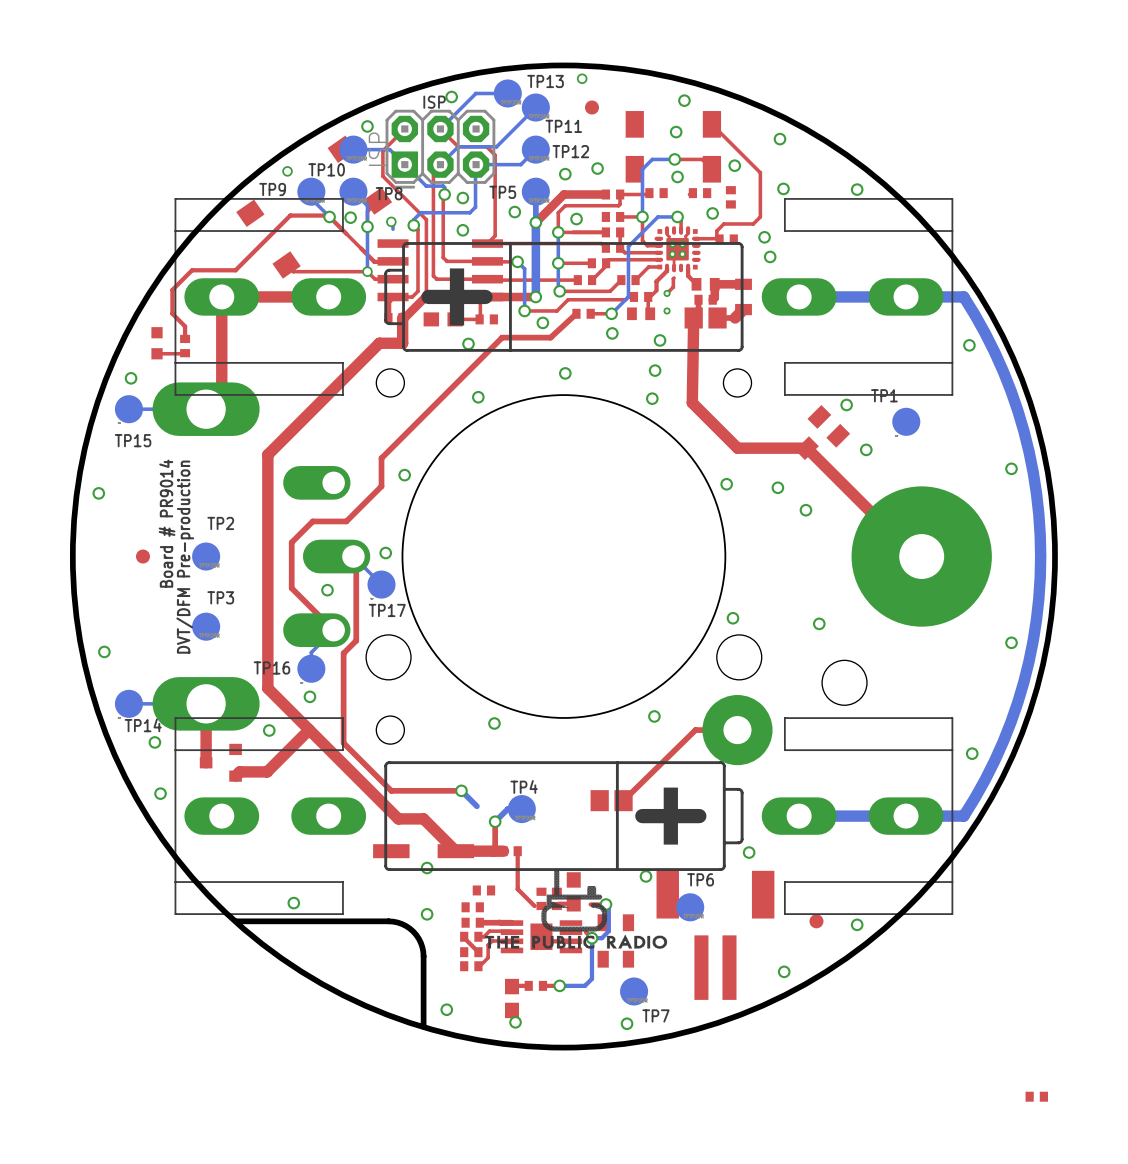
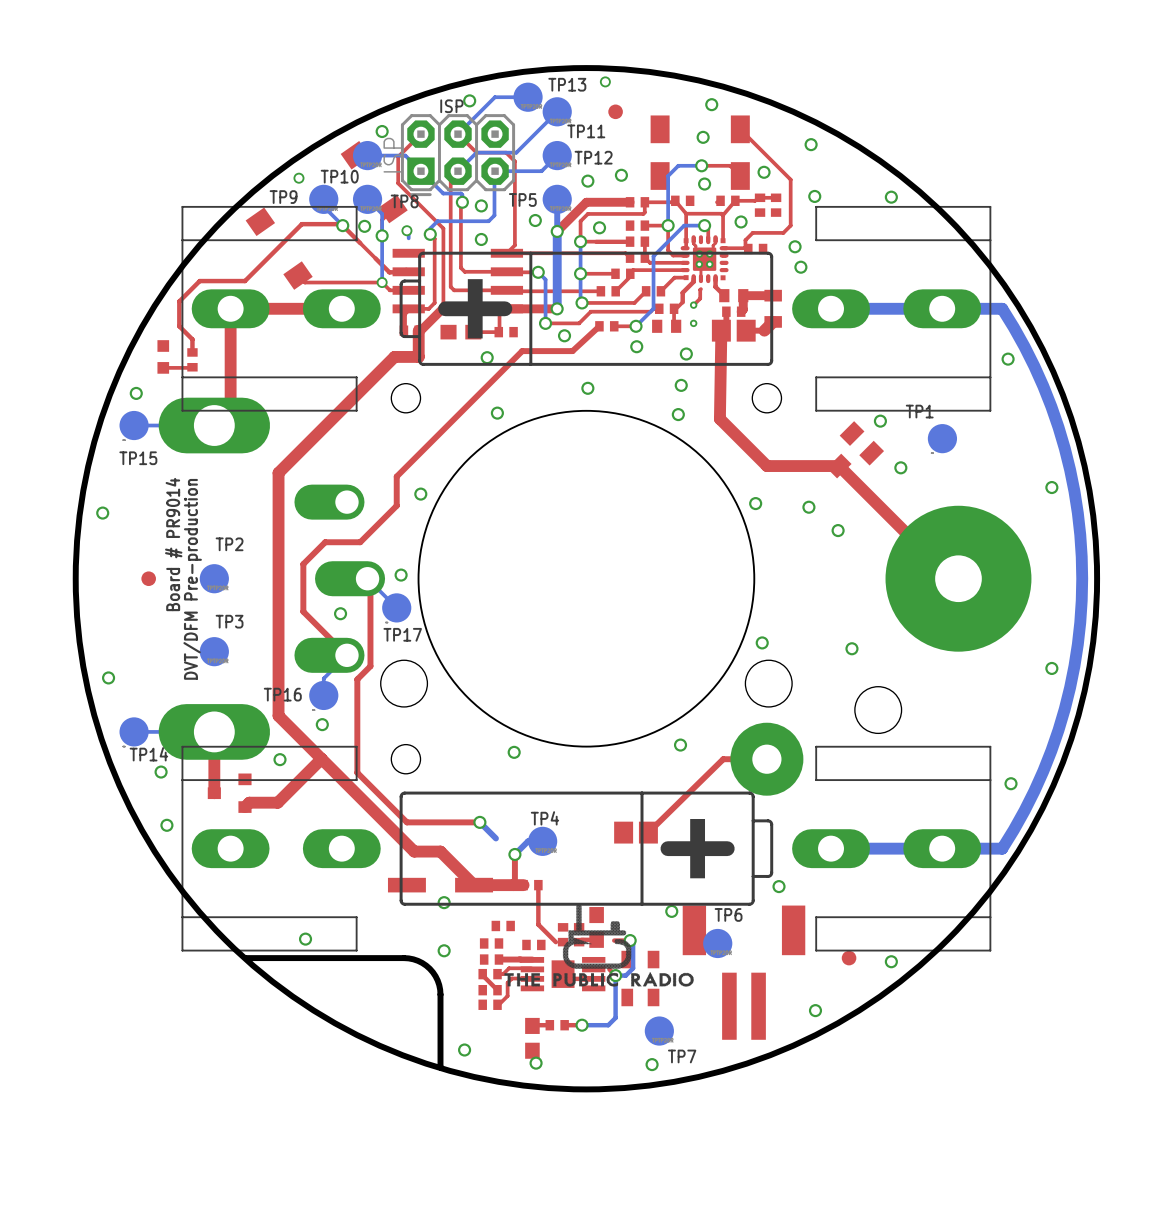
top track: none -> (776, 197) (735, 200) (723, 215)
top track: none -> (671, 202) (675, 200) (686, 213)
part: none -> (776, 205)
top track: none -> (686, 213) (685, 248)
top track: none -> (686, 213) (723, 215)
top track: none -> (723, 215) (723, 240)
part: none -> (533, 944)
part: (1036, 1096) -> none

